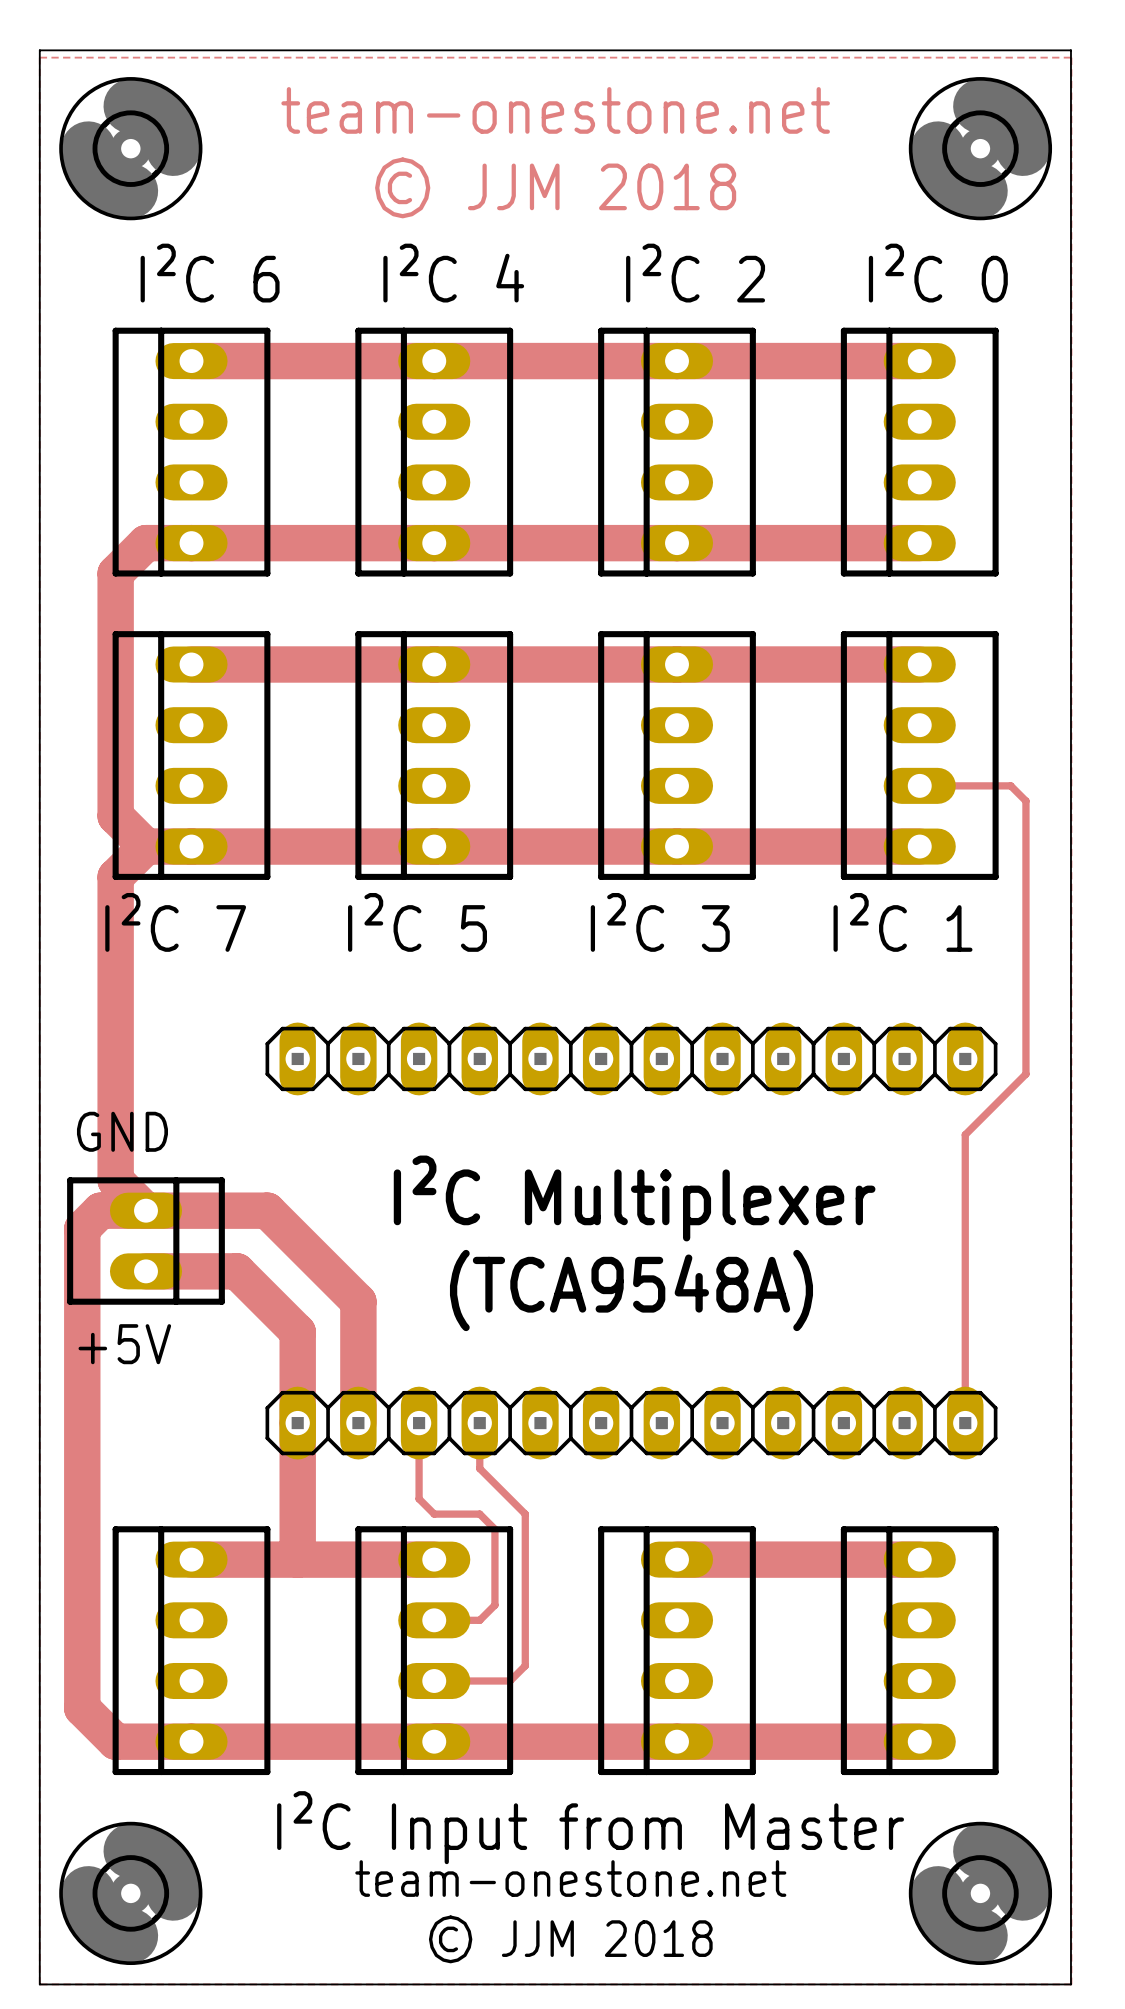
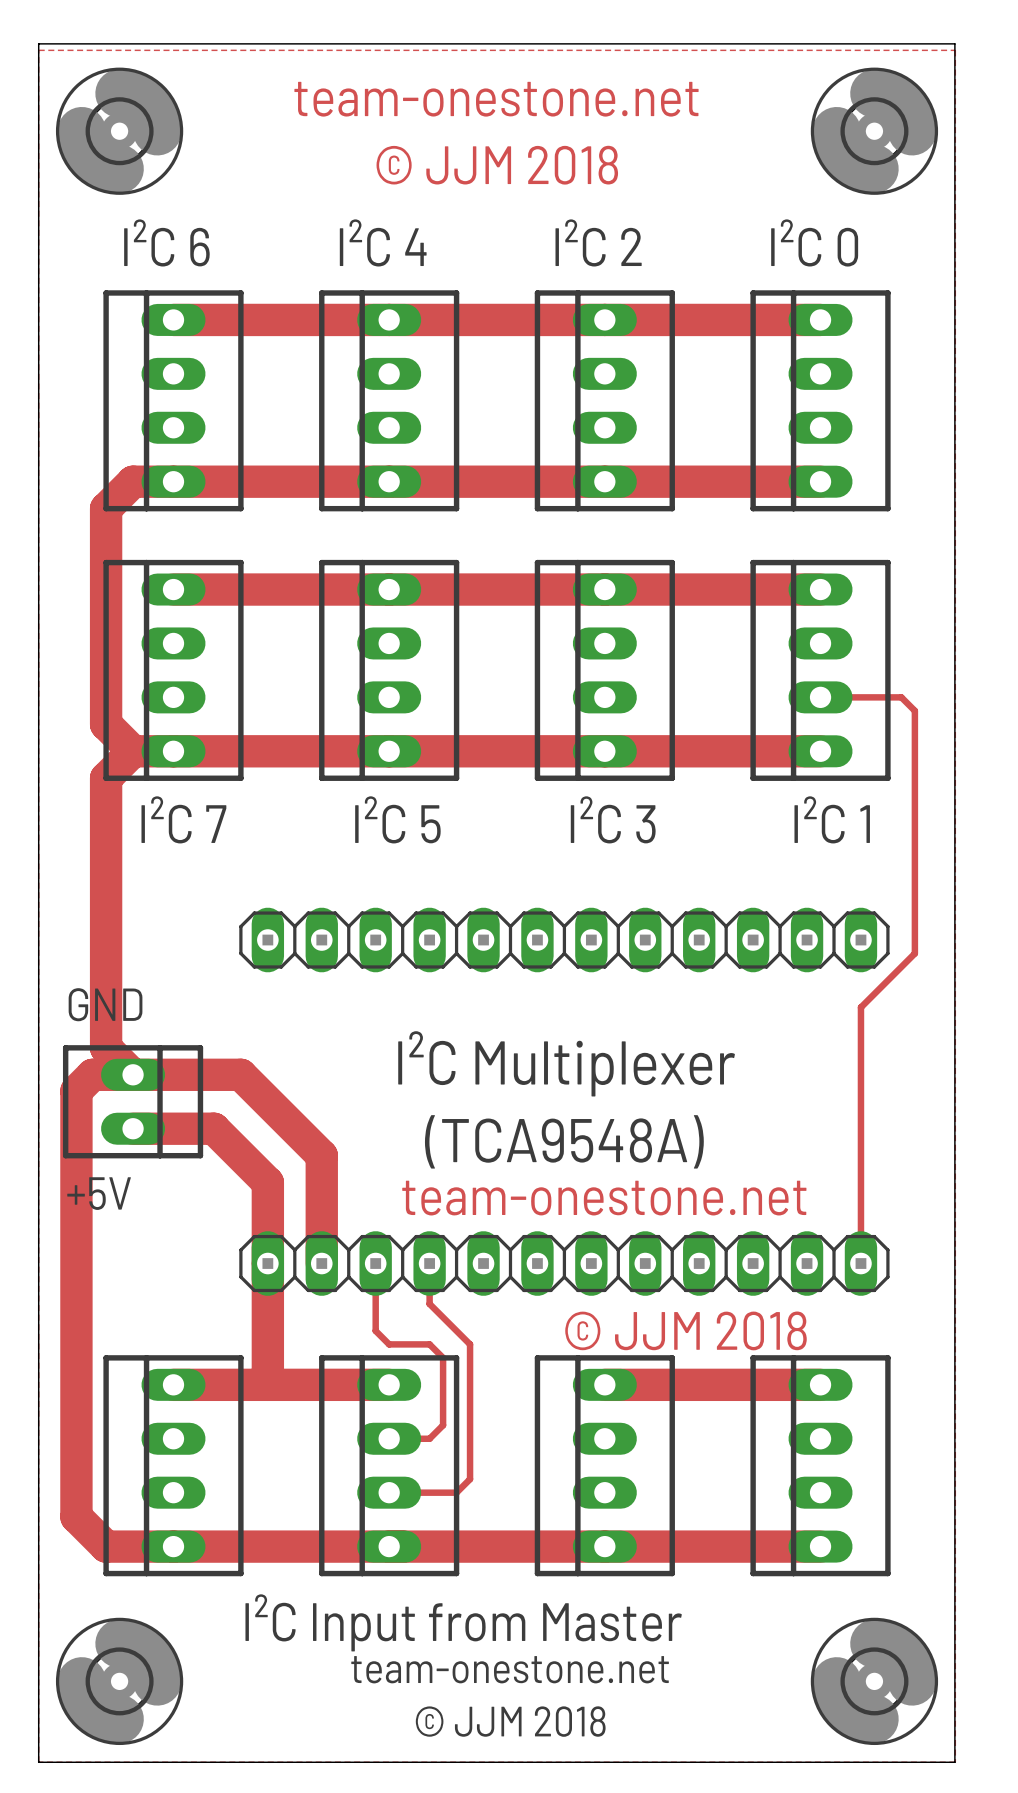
text: none -> team-onestone.net (604, 1198)
text: none -> © JJM 2018 (685, 1330)

